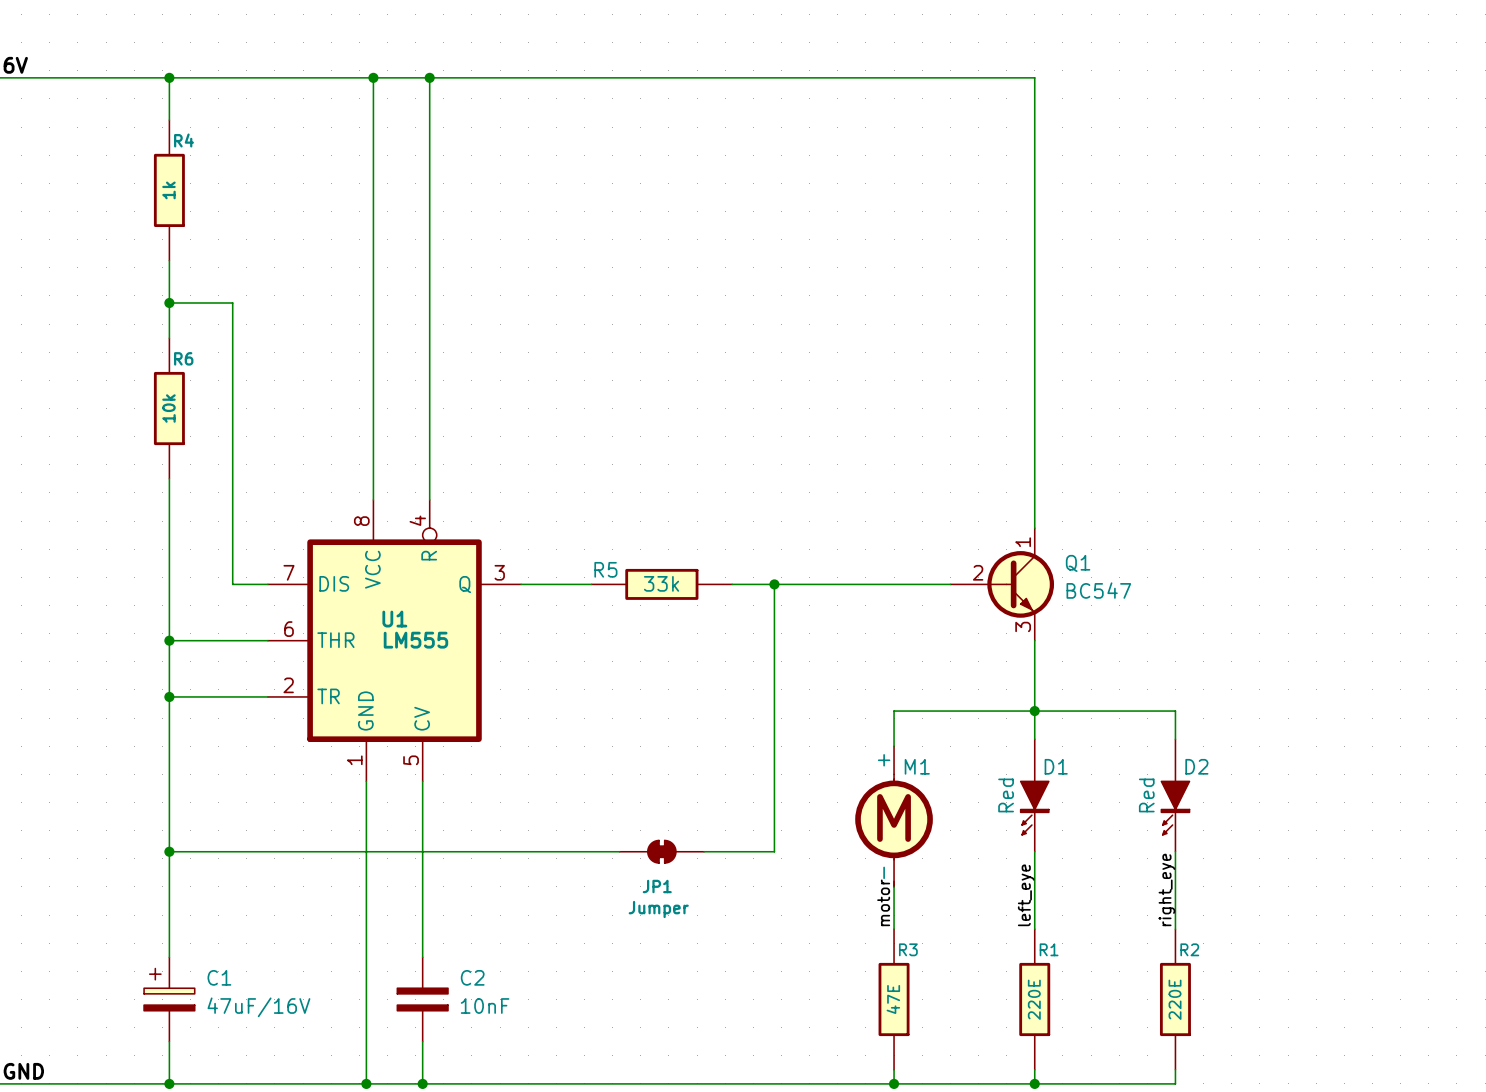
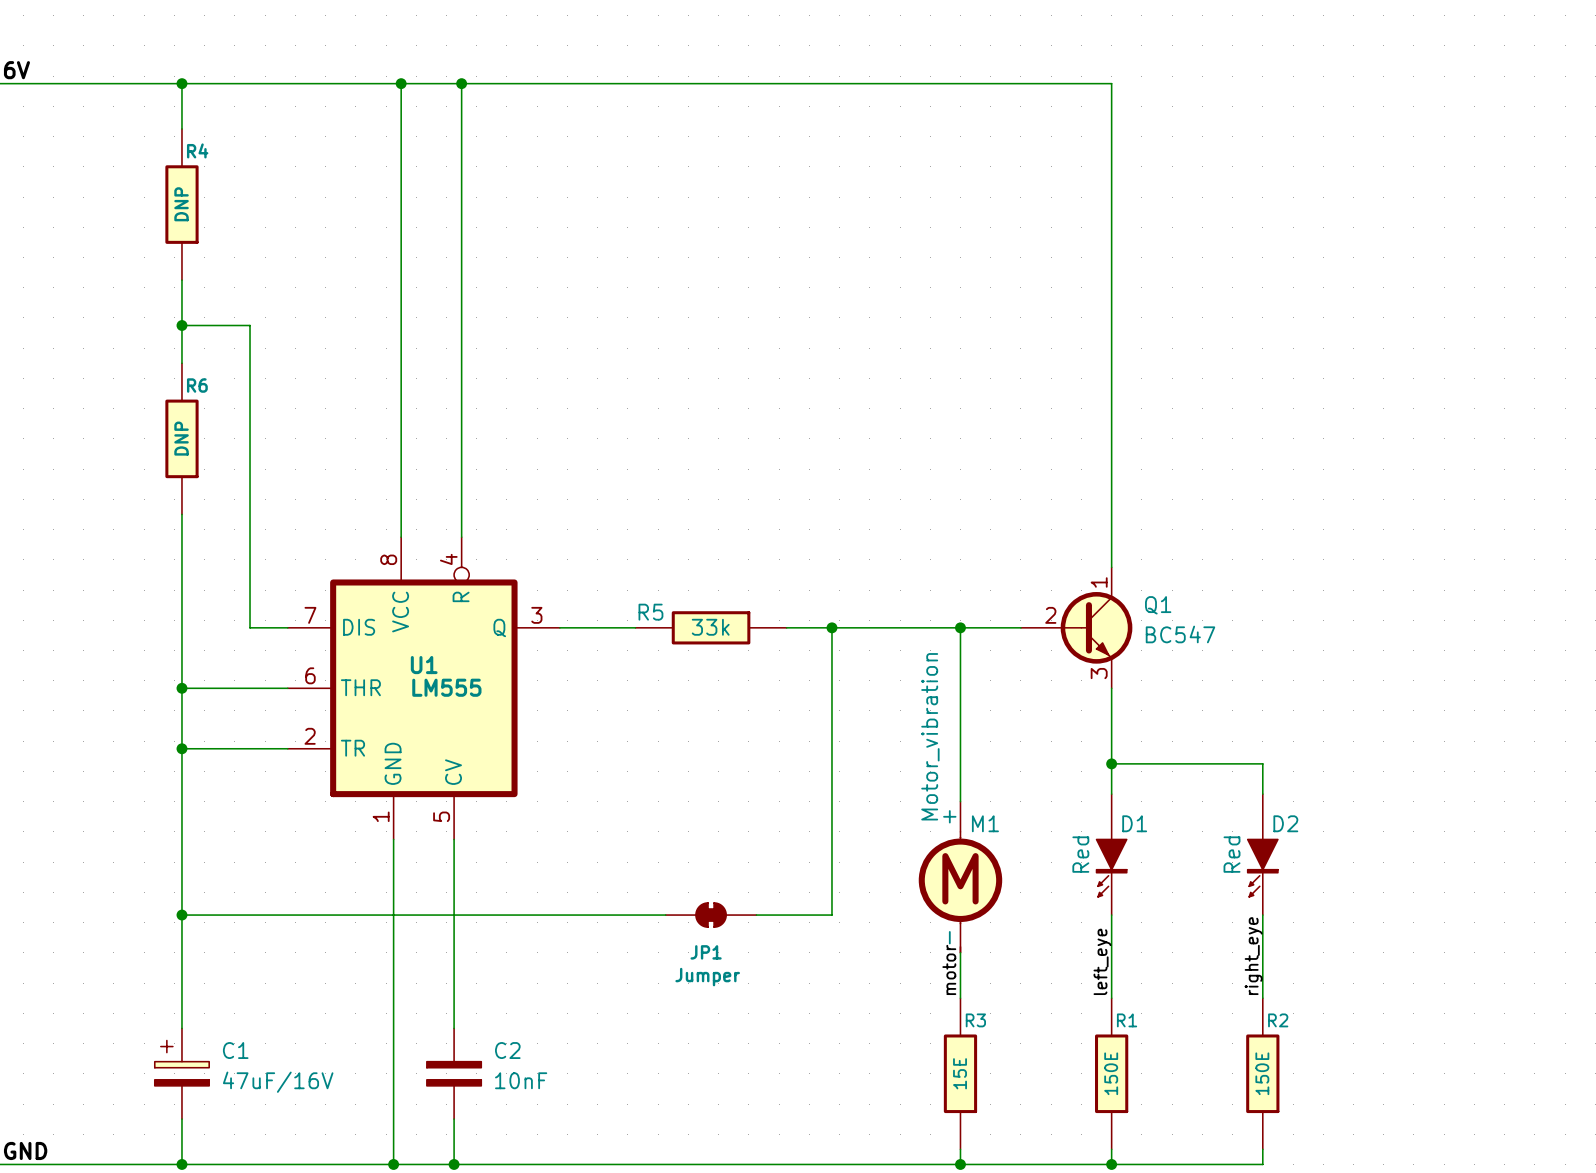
R4 value: 1k (168, 190) -> DNP (181, 204)
R6 value: 10k (168, 408) -> DNP (181, 438)
junction: none -> (960, 627)
M1 value: none -> Motor_vibration (930, 736)
wire: (894, 711) (1034, 711) -> (960, 763) (960, 627)
R3 value: 47E (893, 999) -> 15E (960, 1073)
R1 value: 220E (1034, 999) -> 150E (1111, 1073)
R2 value: 220E (1175, 999) -> 150E (1262, 1073)

